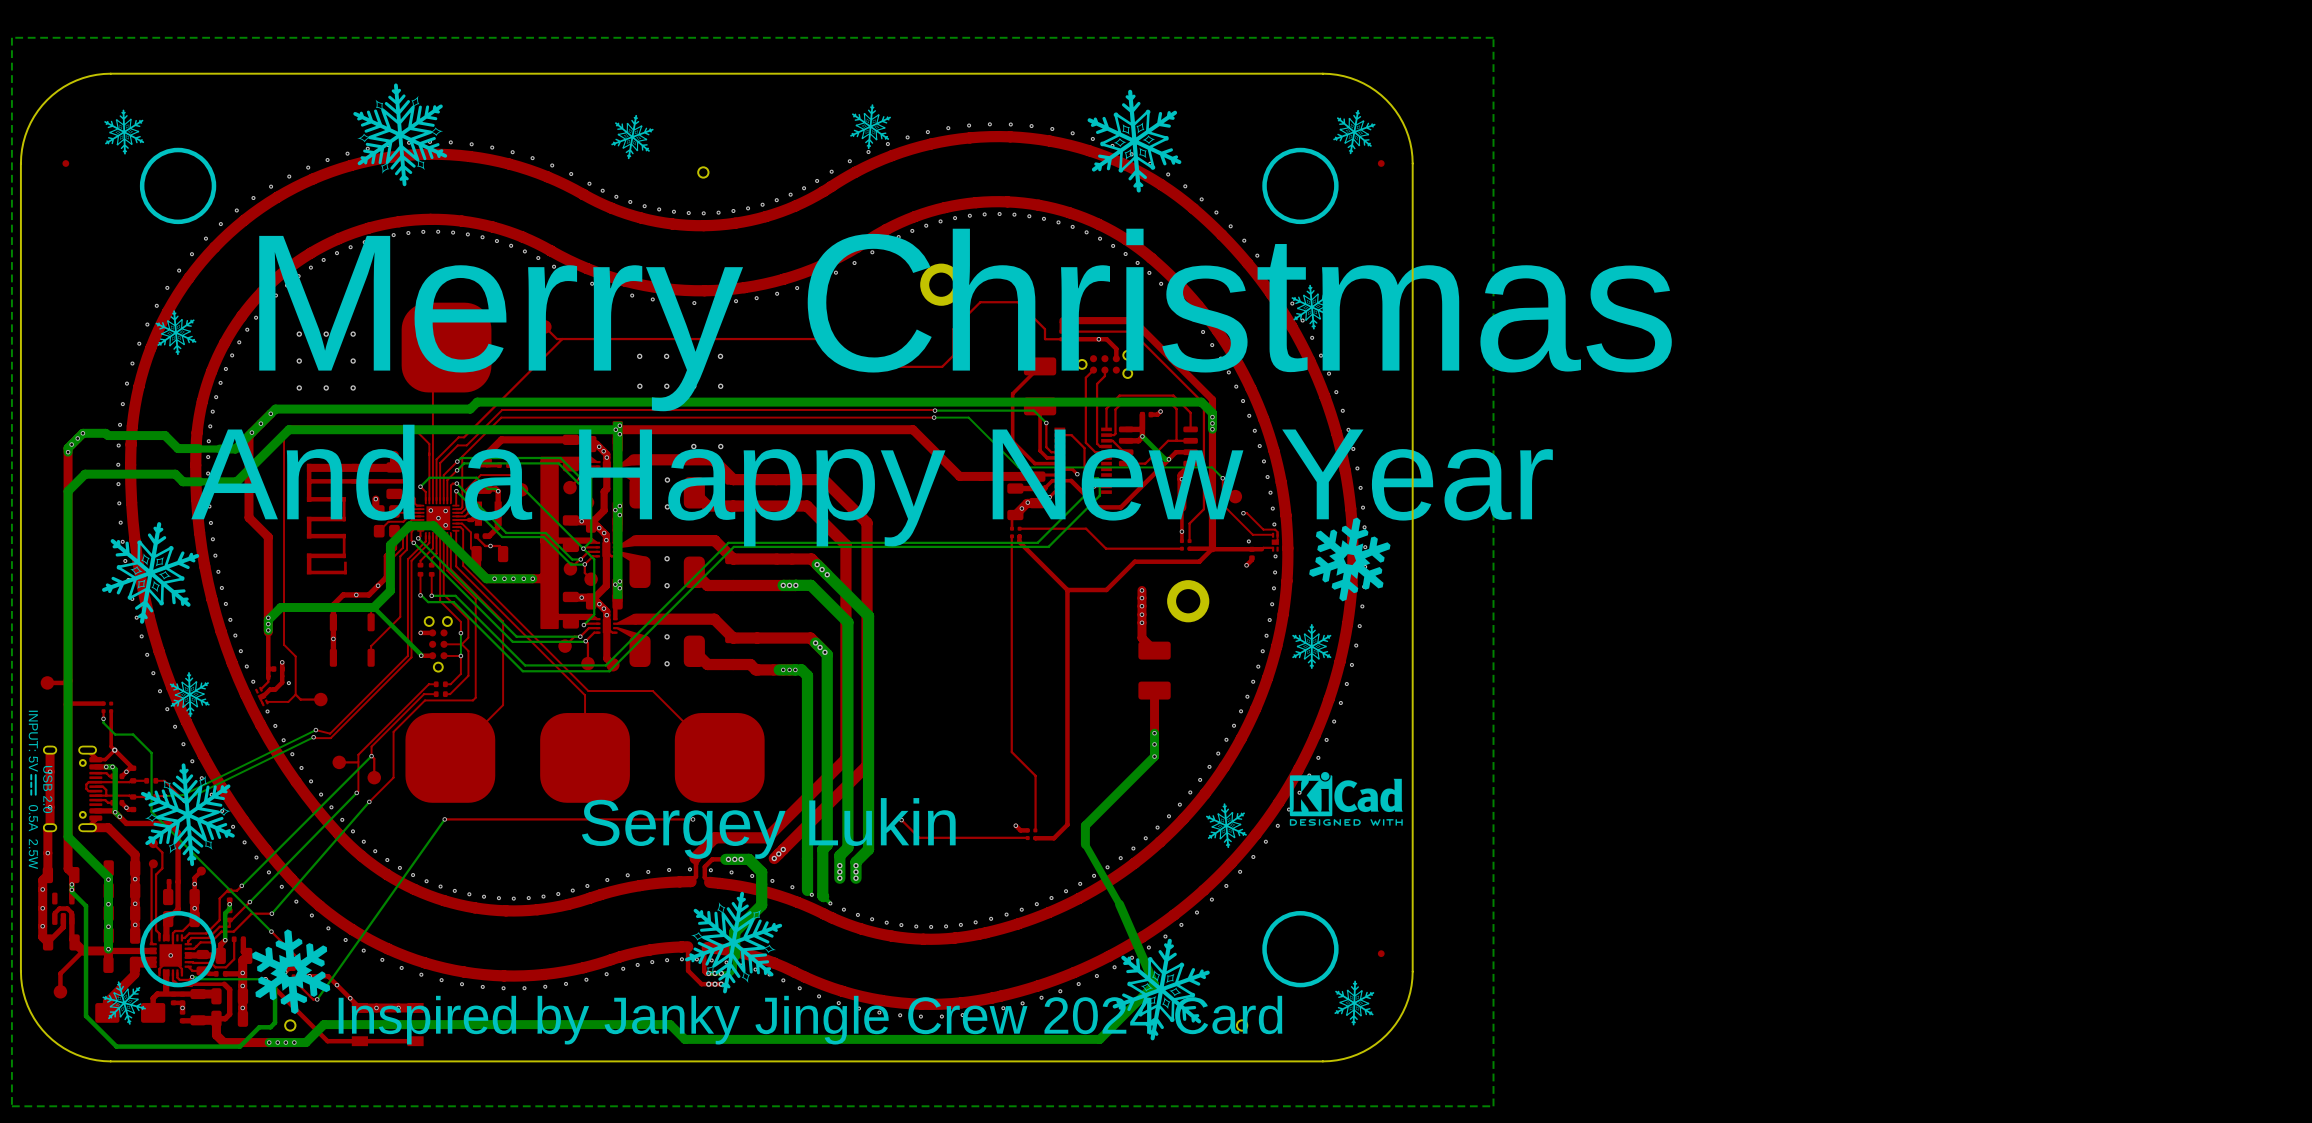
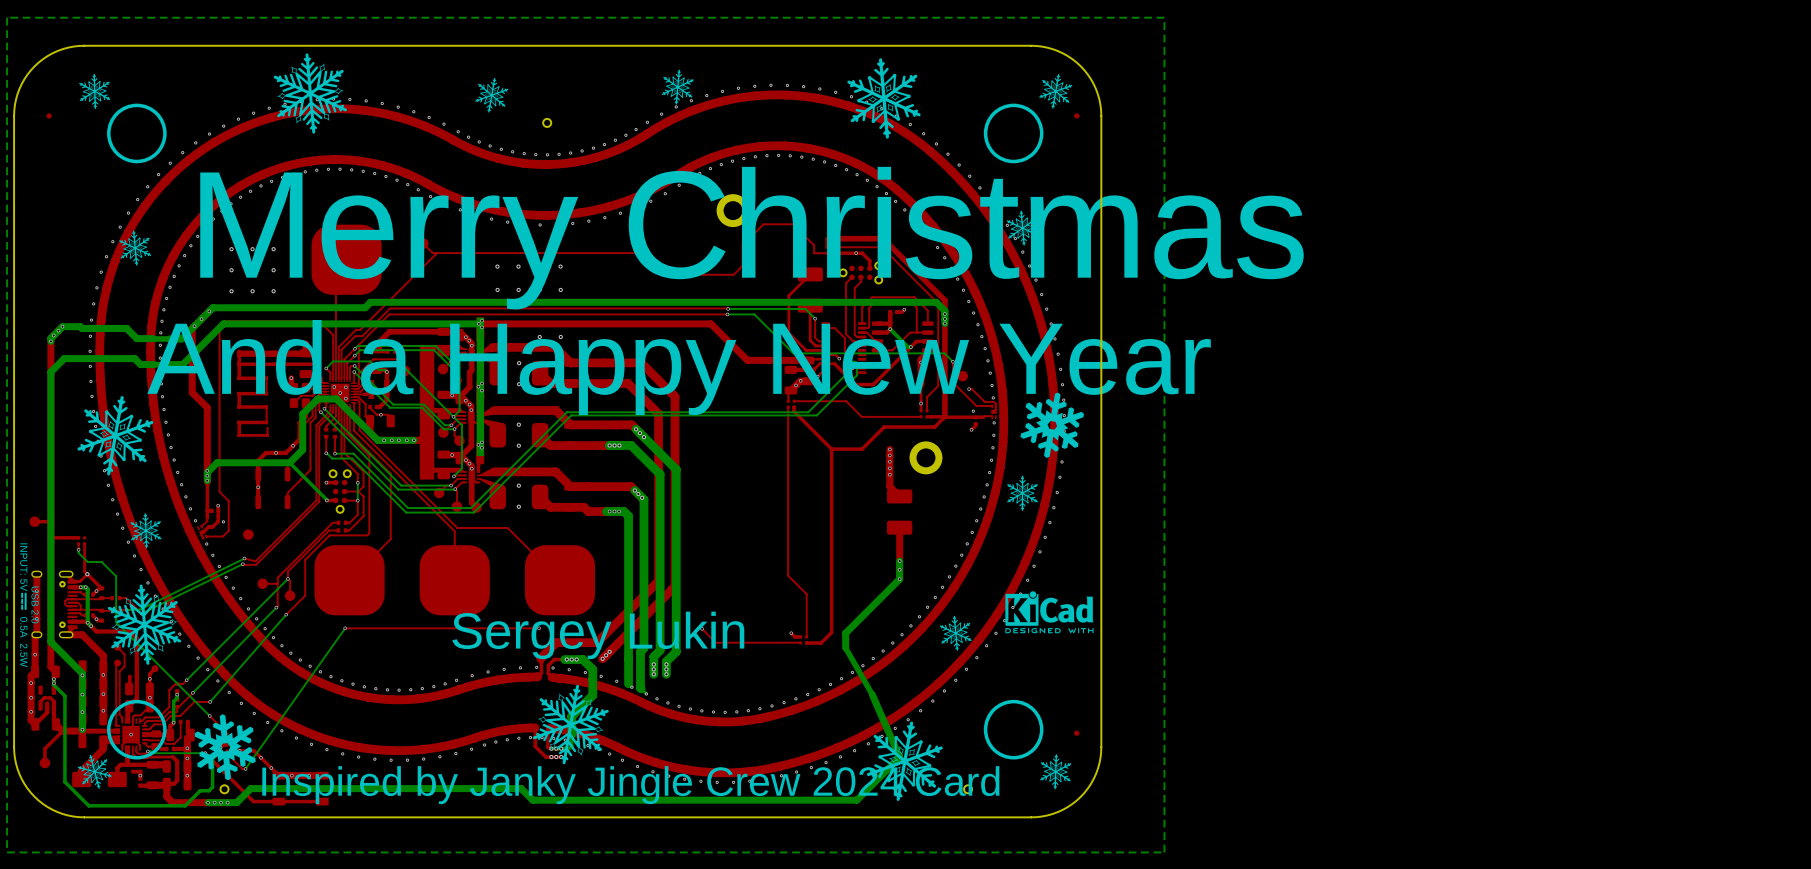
top track: (295, 694) (300, 699) (320, 699) -> none

